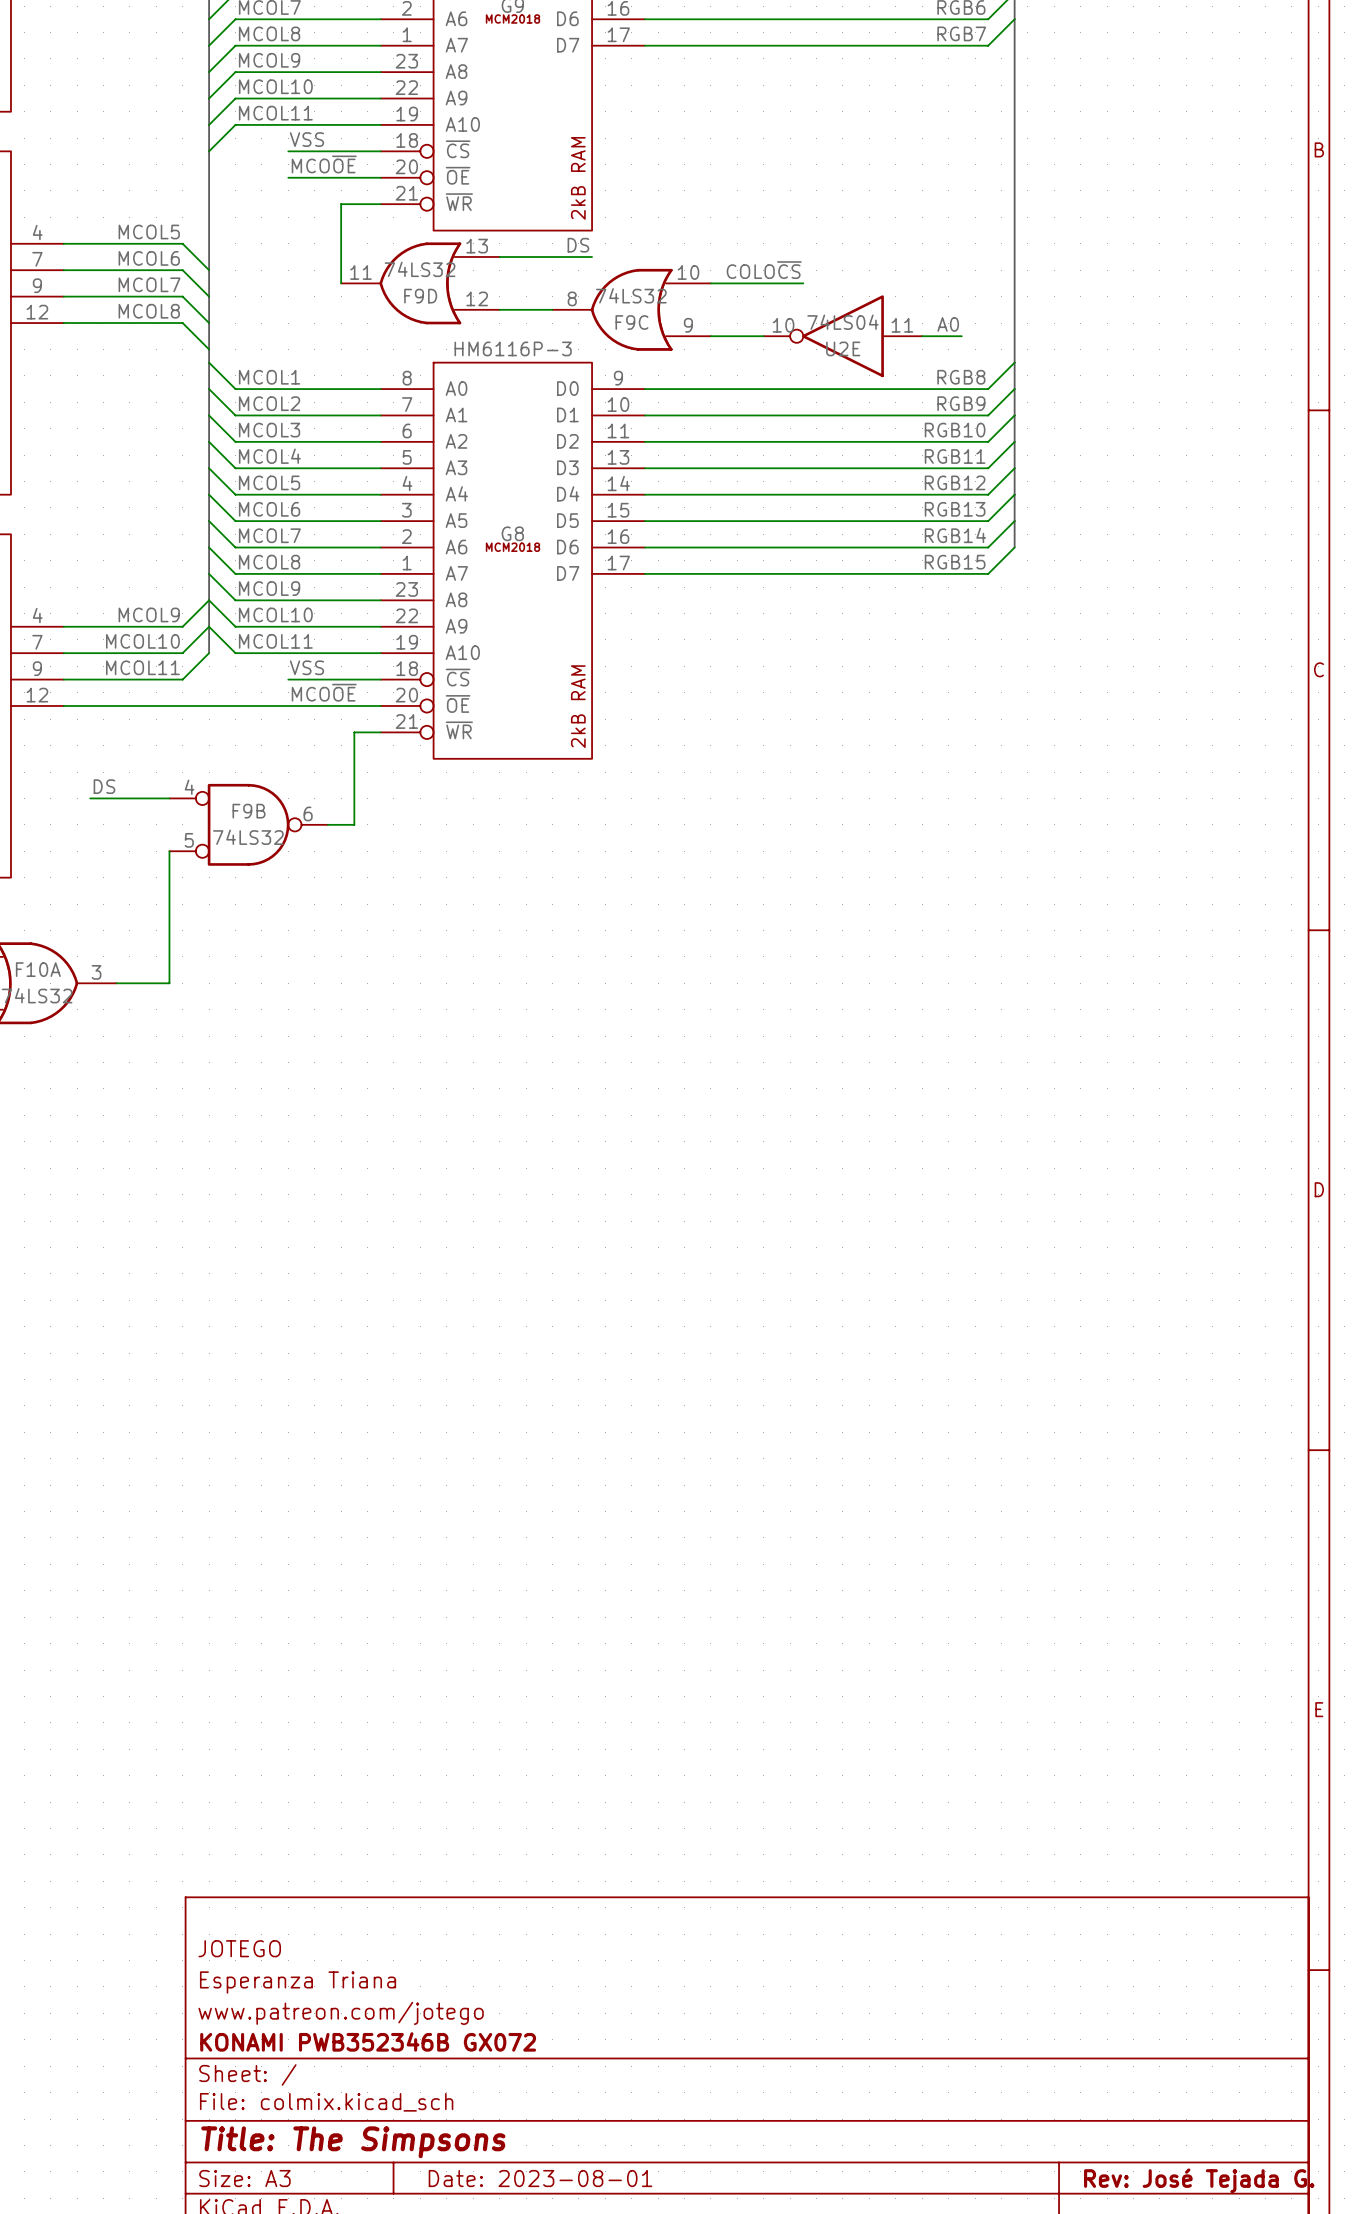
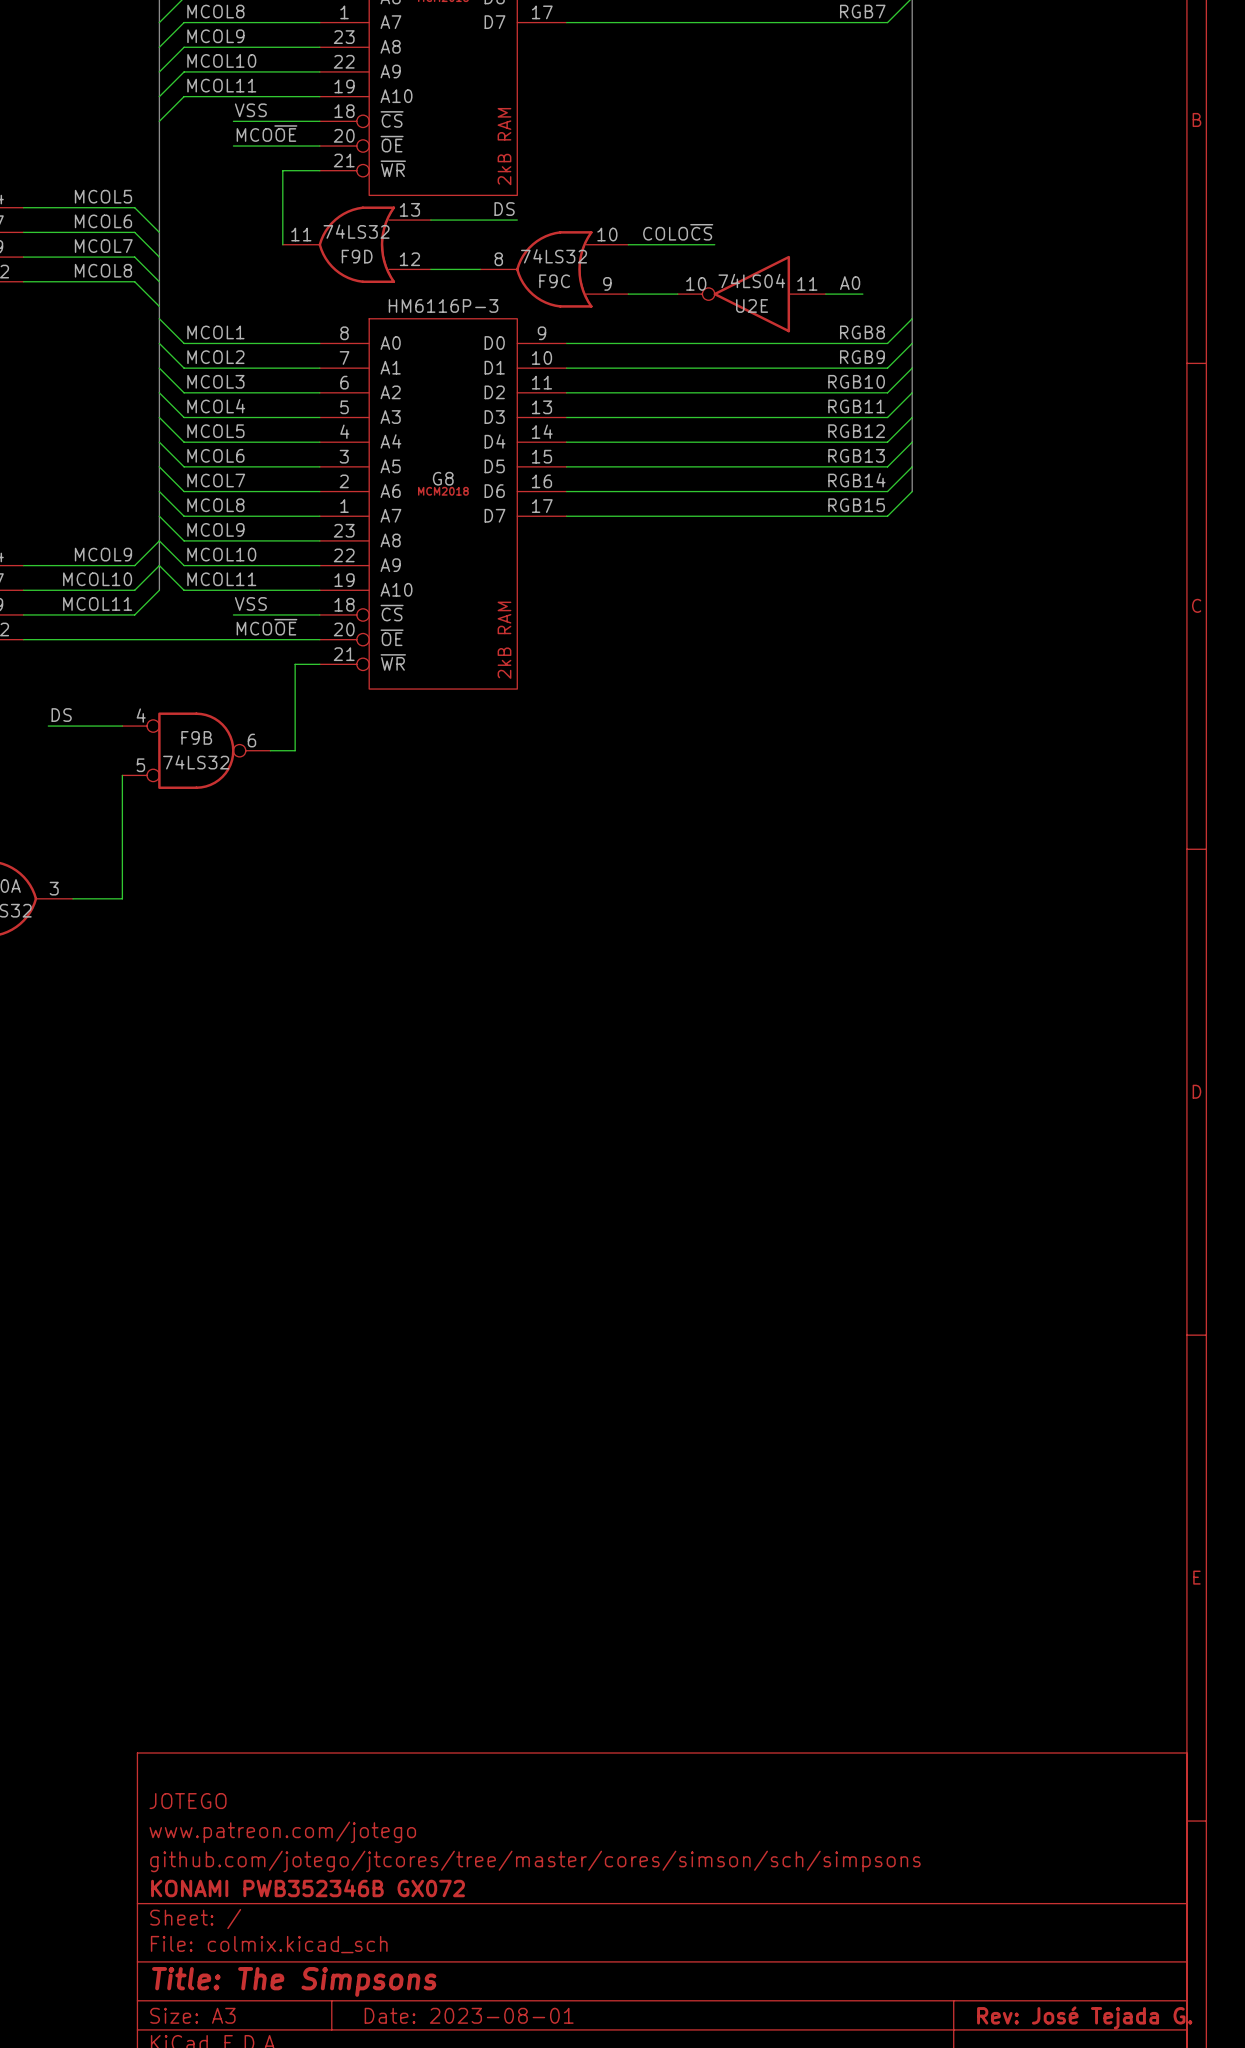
title block: Esperanza Triana (298, 1982) -> www.patreon.com/jotego (282, 1832)
title block: www.patreon.com/jotego (341, 2013) -> github.com/jotego/jtcores/tree/master/cores/simson/sch/simpsons (535, 1861)

